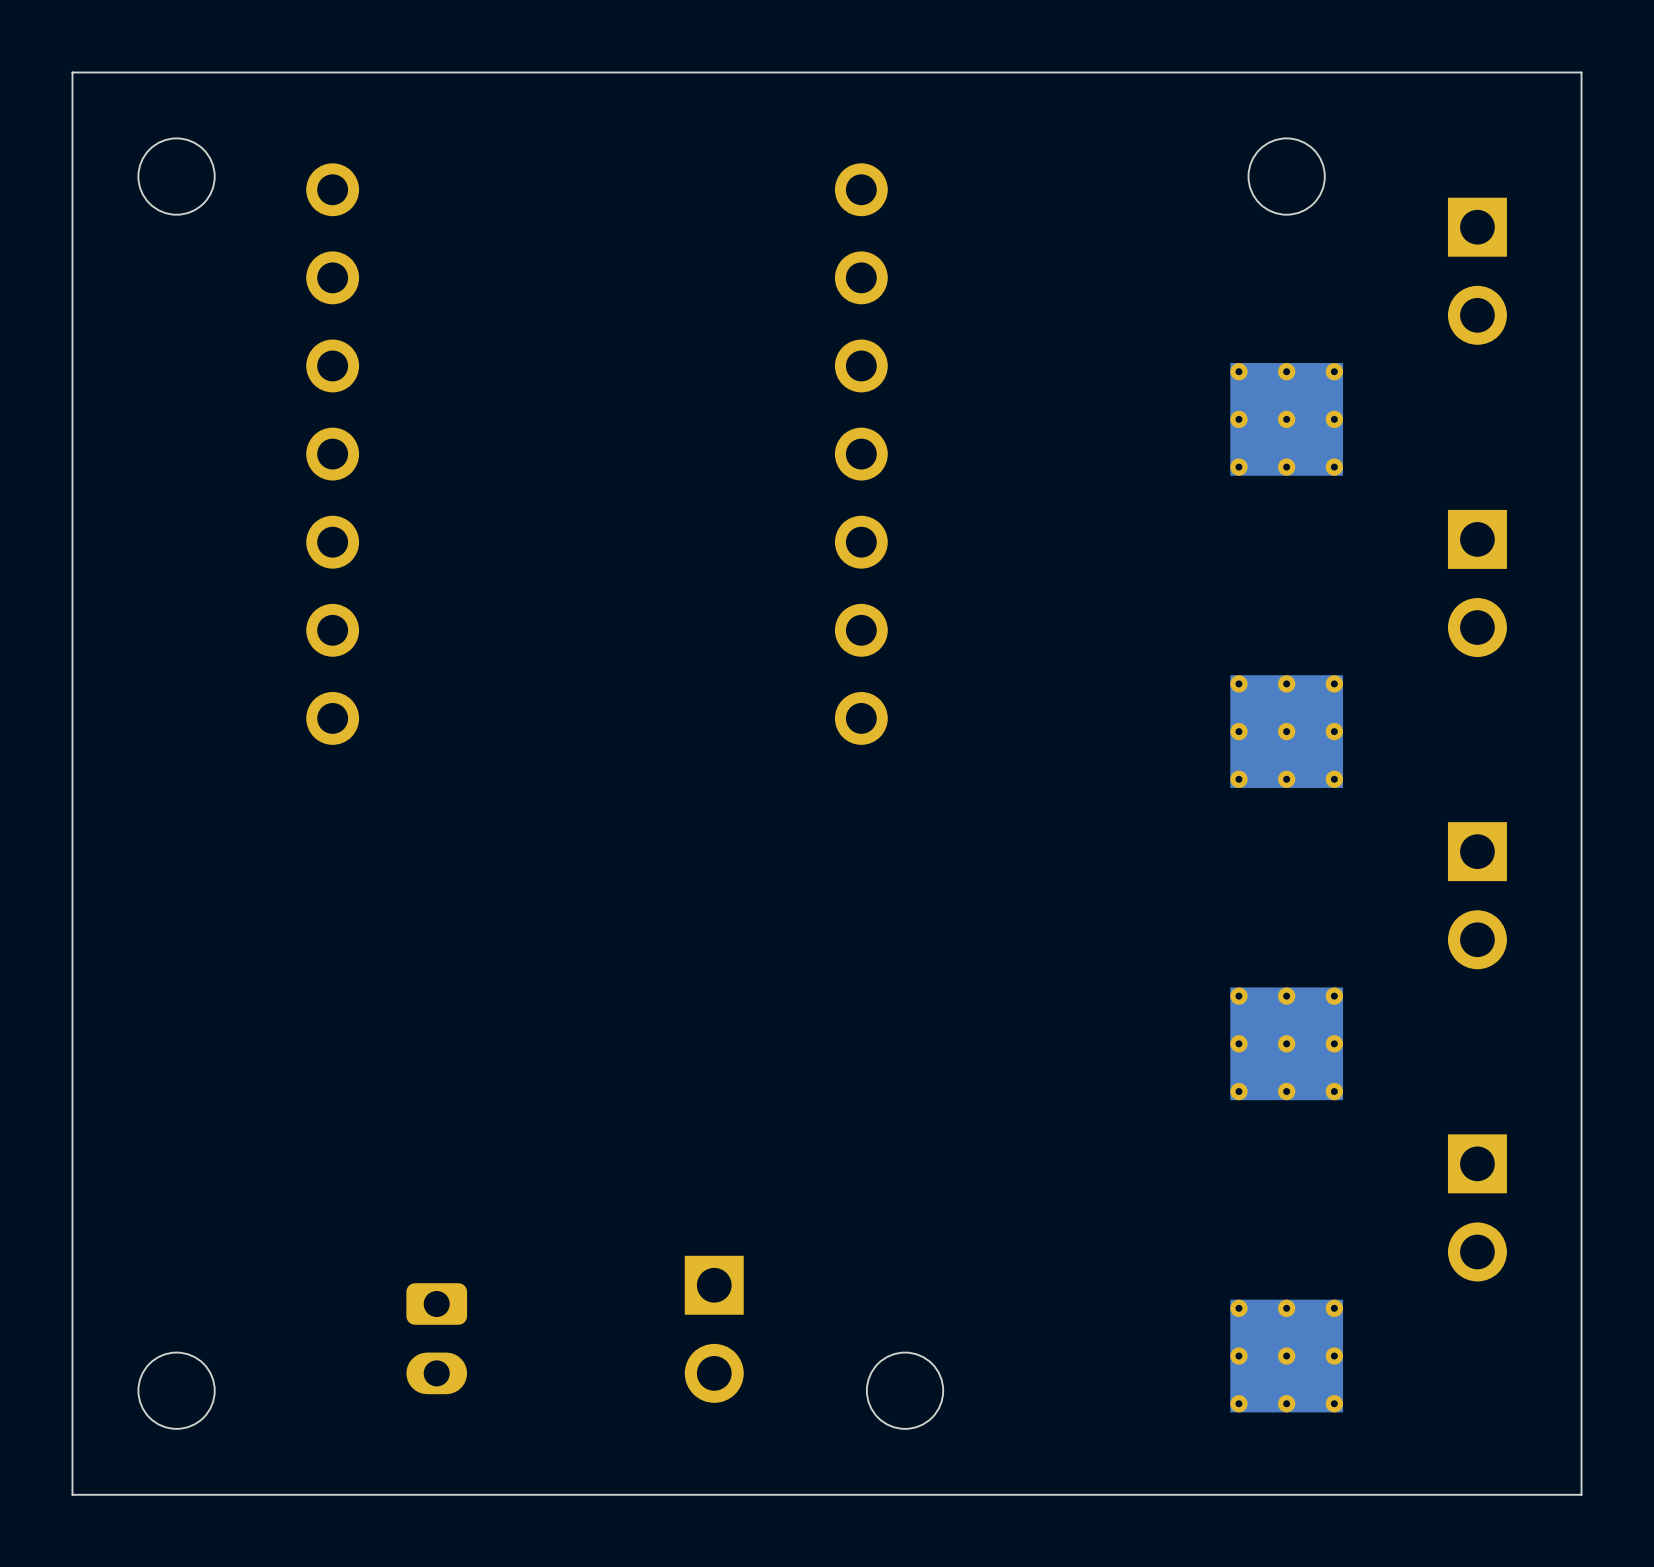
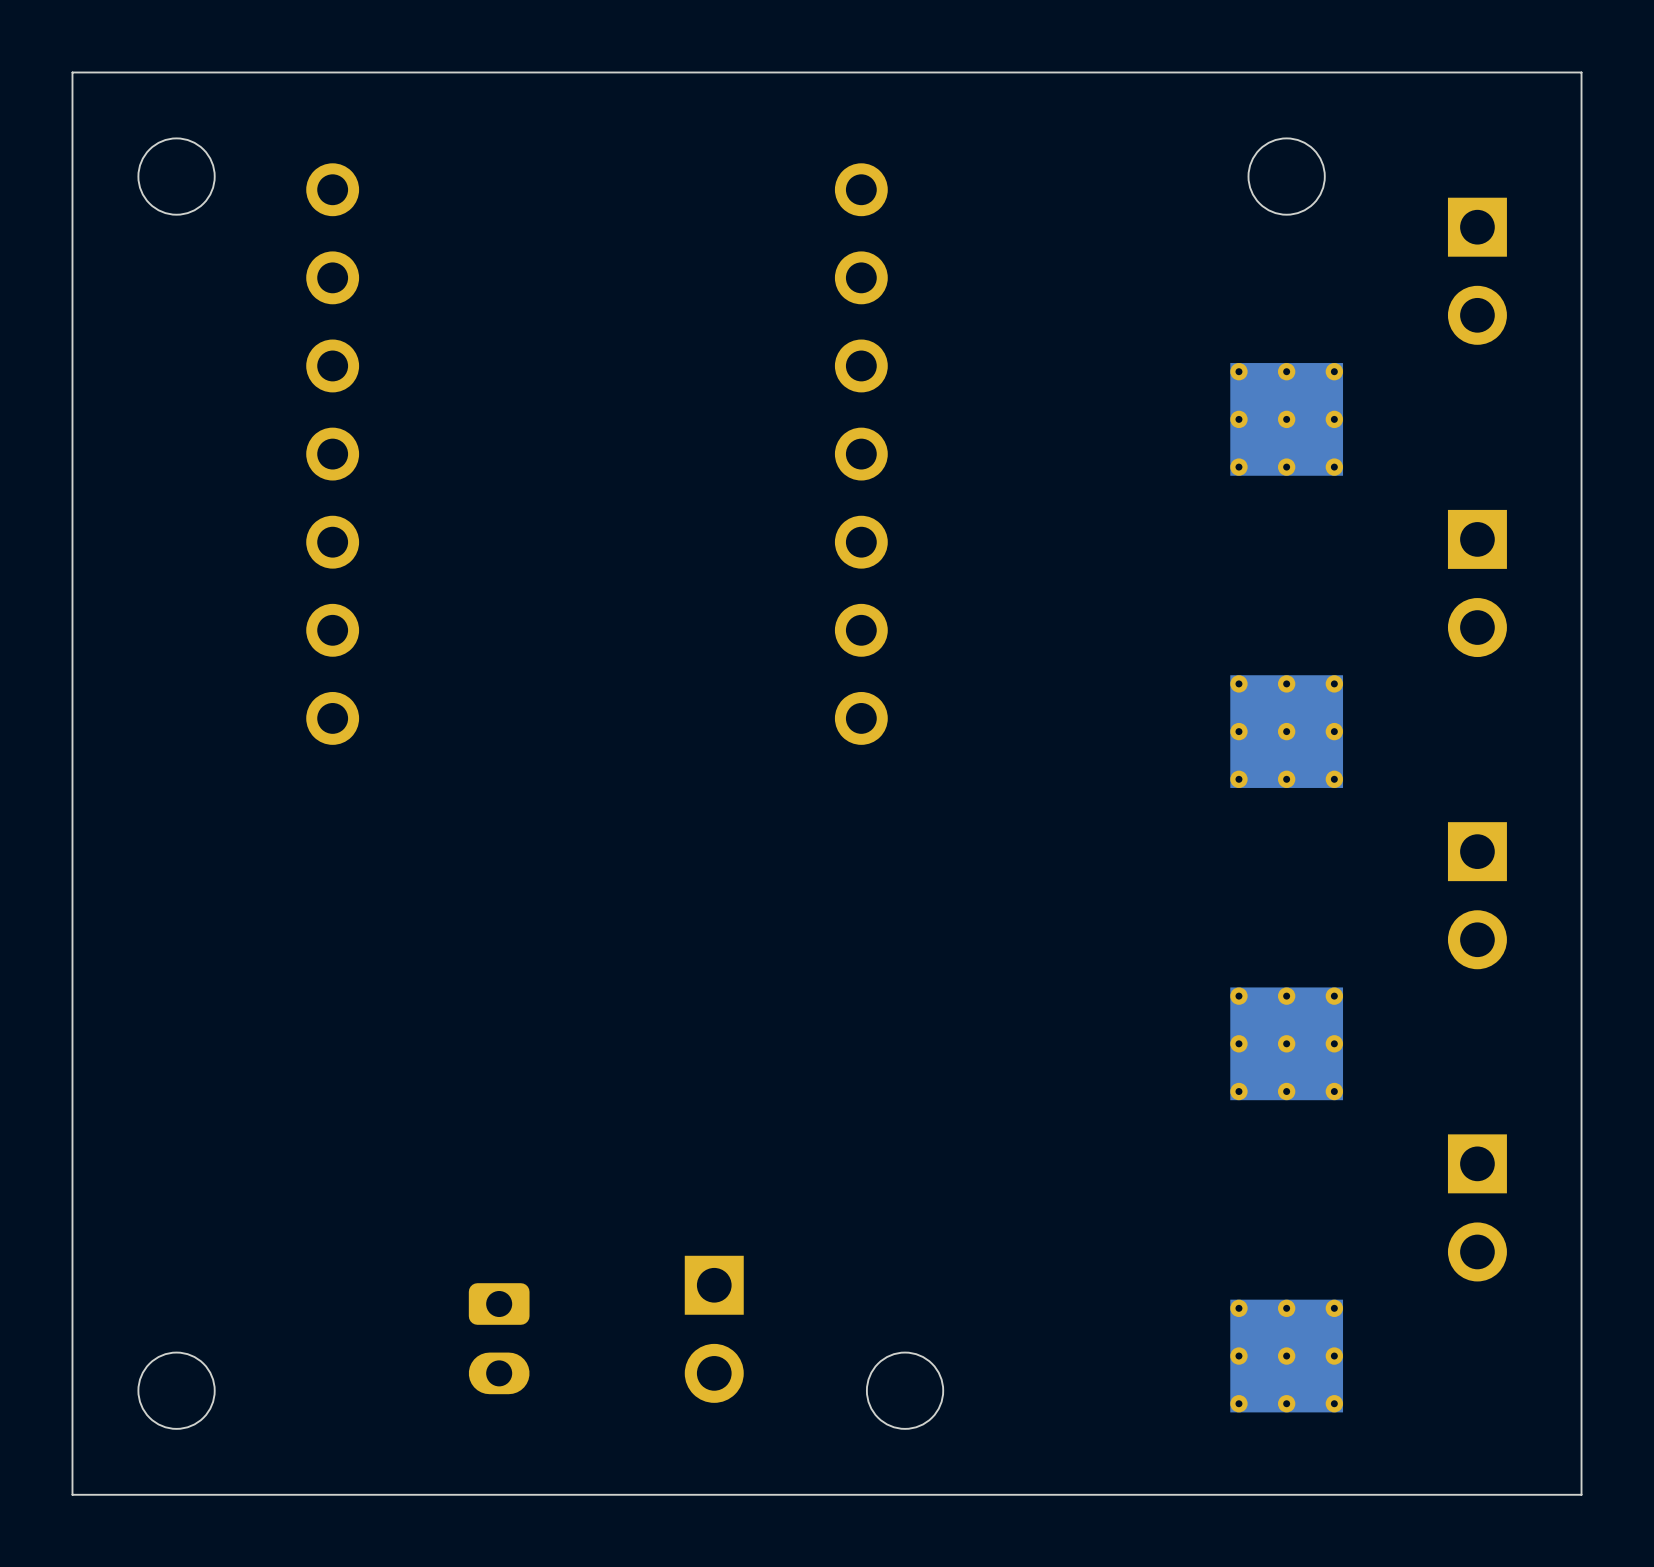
part position: (436, 1338) -> (499, 1338)

